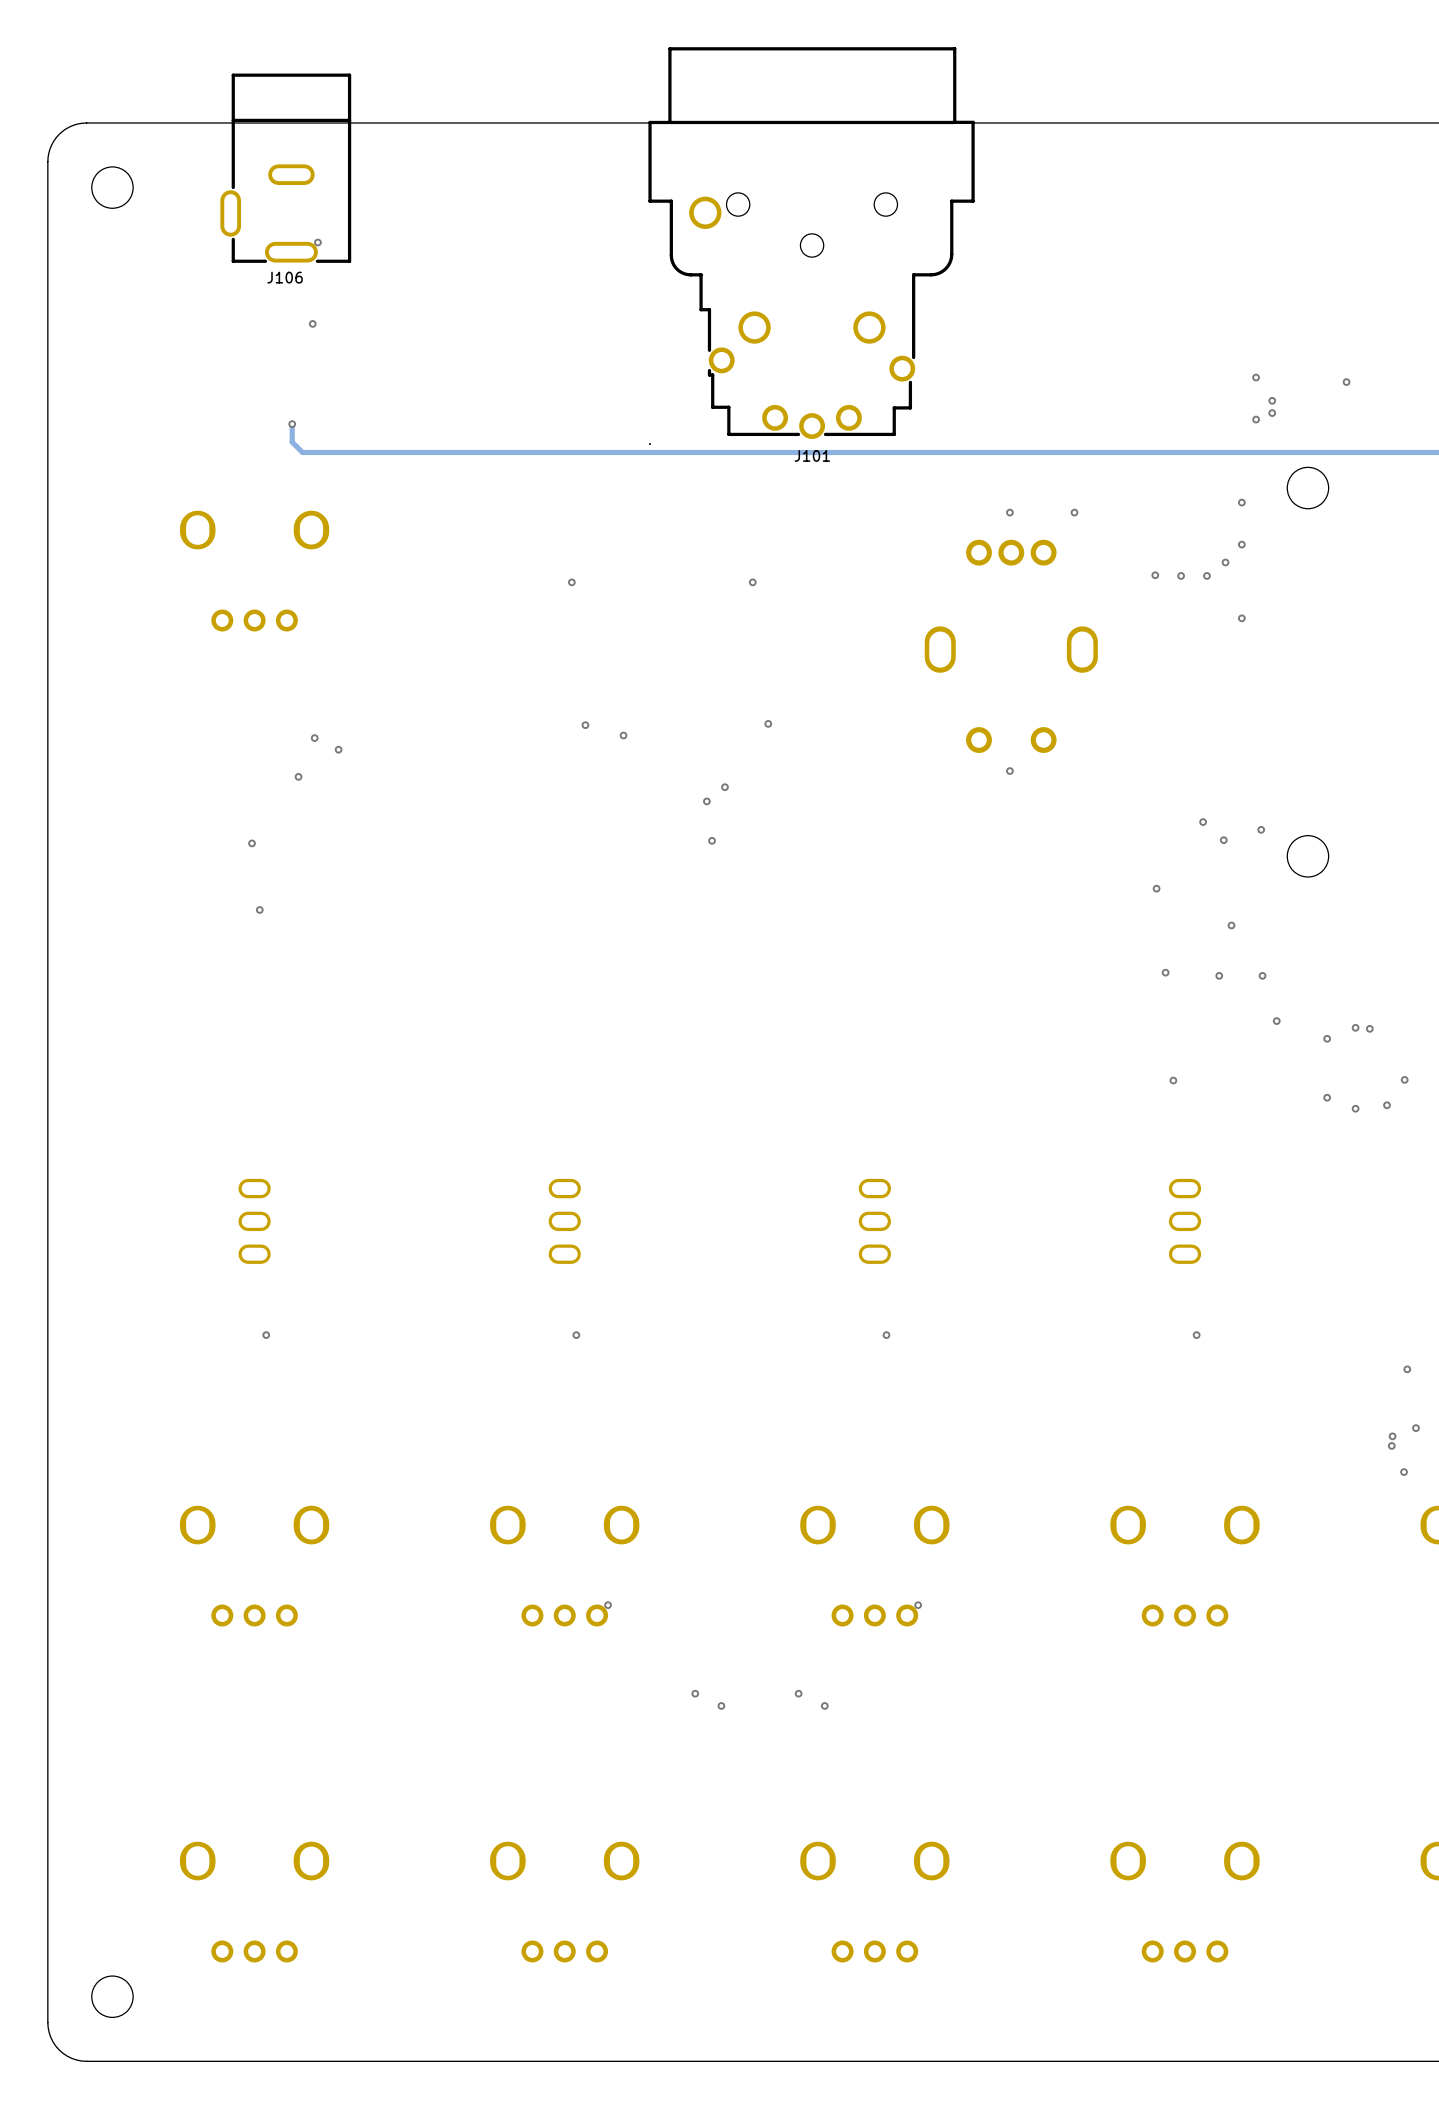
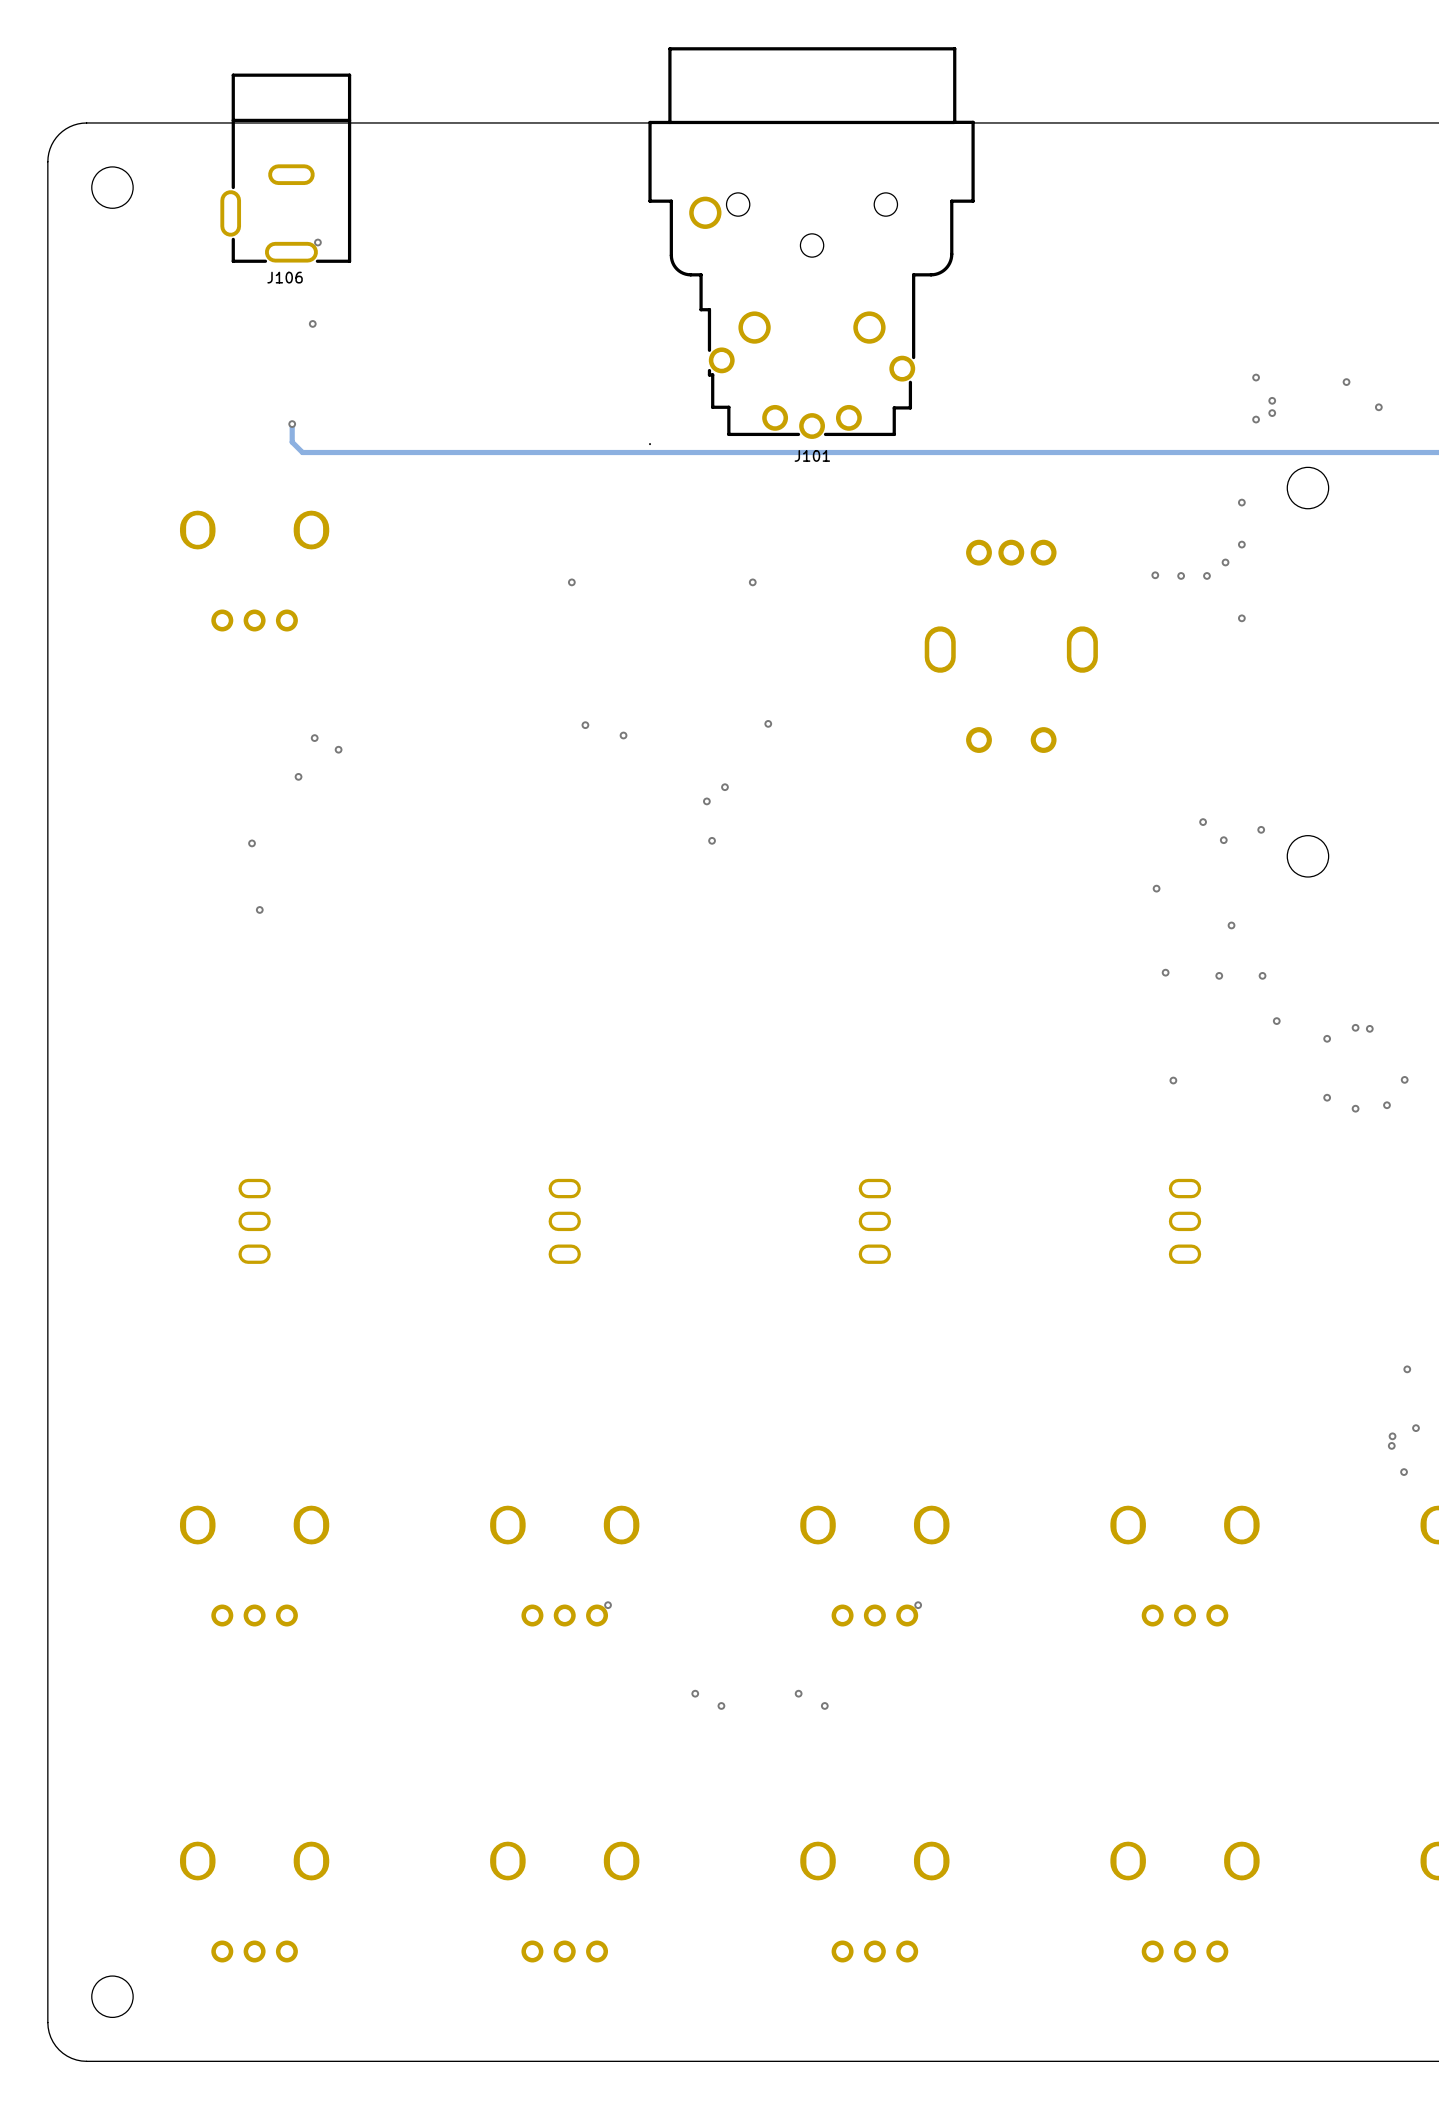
via: none -> (1378, 407)
via: (1009, 512) -> none
via: (1074, 512) -> none
via: (1009, 771) -> none
via: (266, 1335) -> none
via: (576, 1335) -> none
via: (886, 1335) -> none
via: (1196, 1335) -> none

